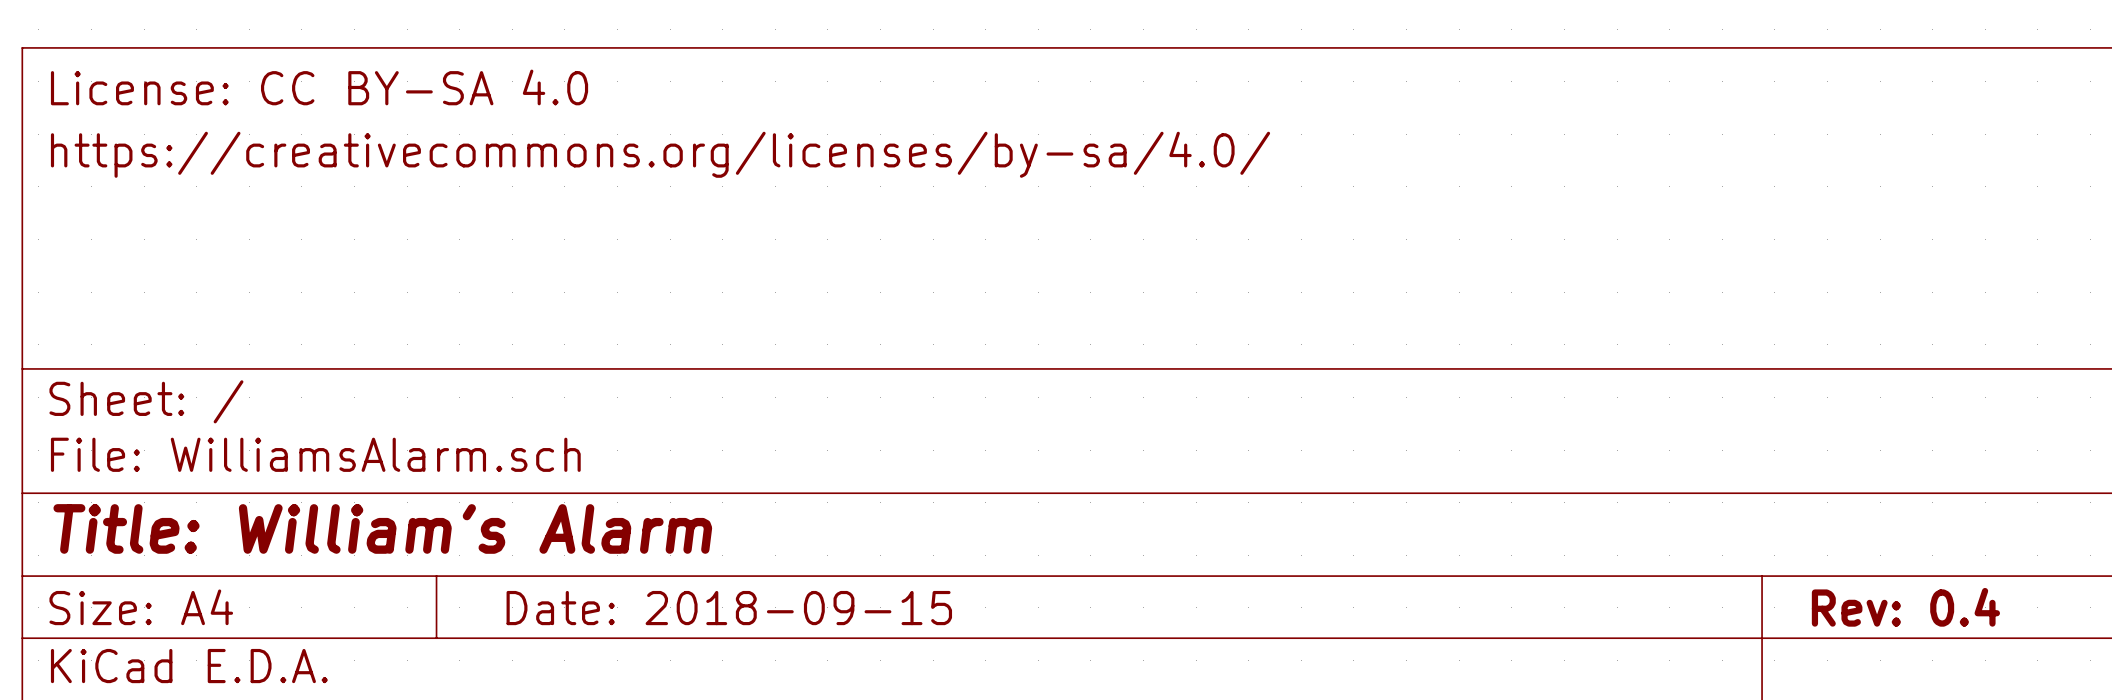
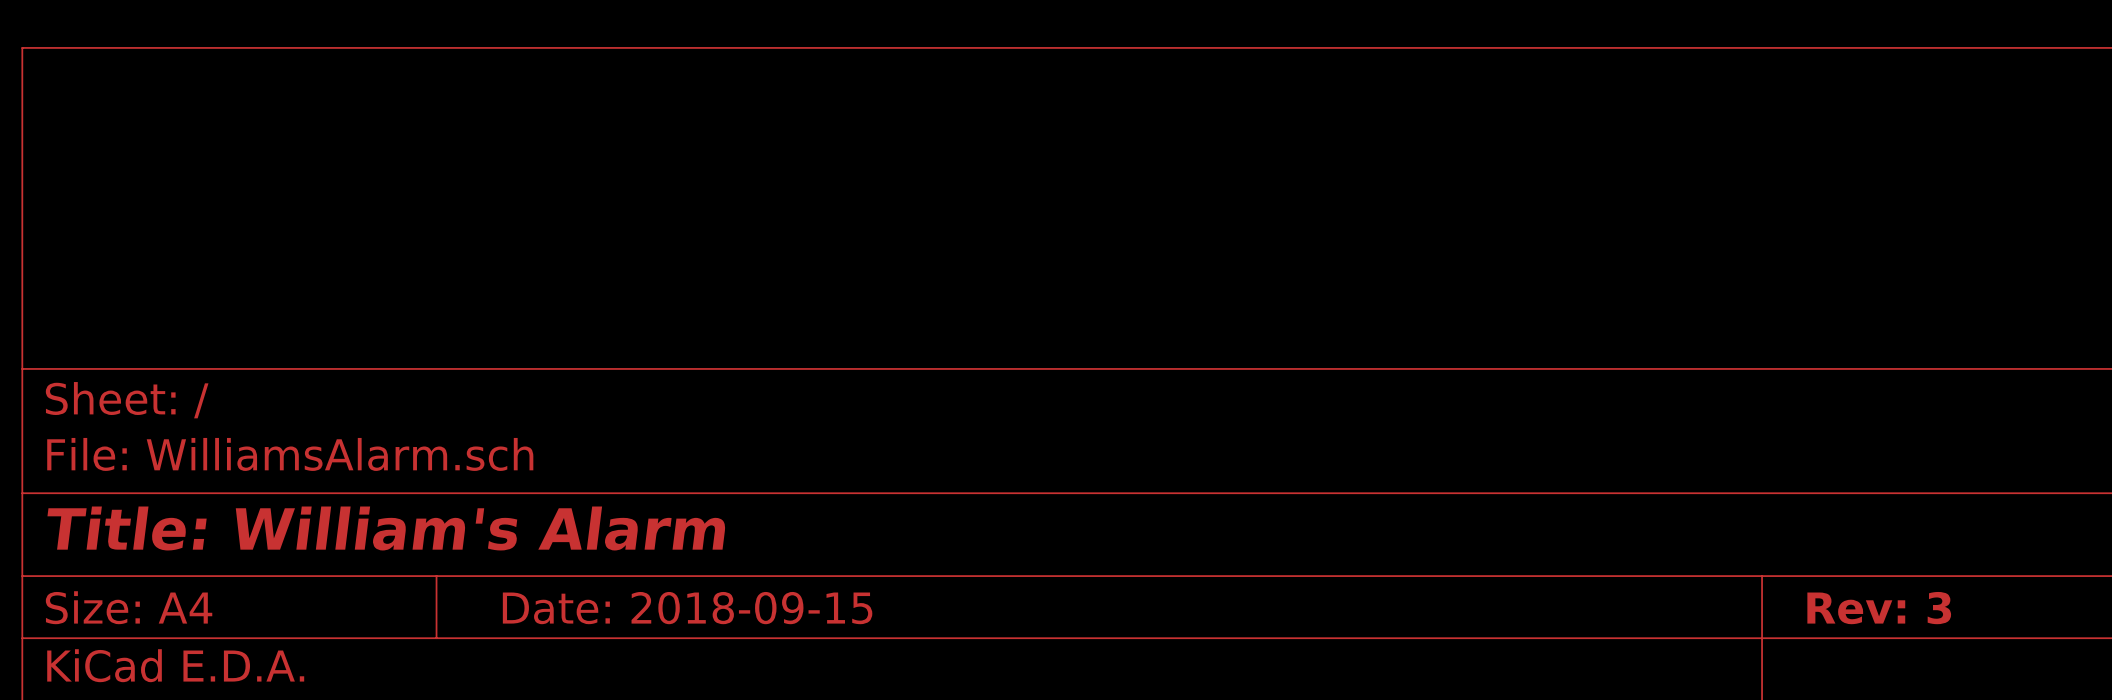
title block: License: CC BY-SA 4.0 (319, 87) -> none
title block: https://creativecommons.org/licenses/by-sa/4.0/ (660, 154) -> none
title block: Rev: 0.4 (1905, 607) -> Rev: 3 (1879, 608)

